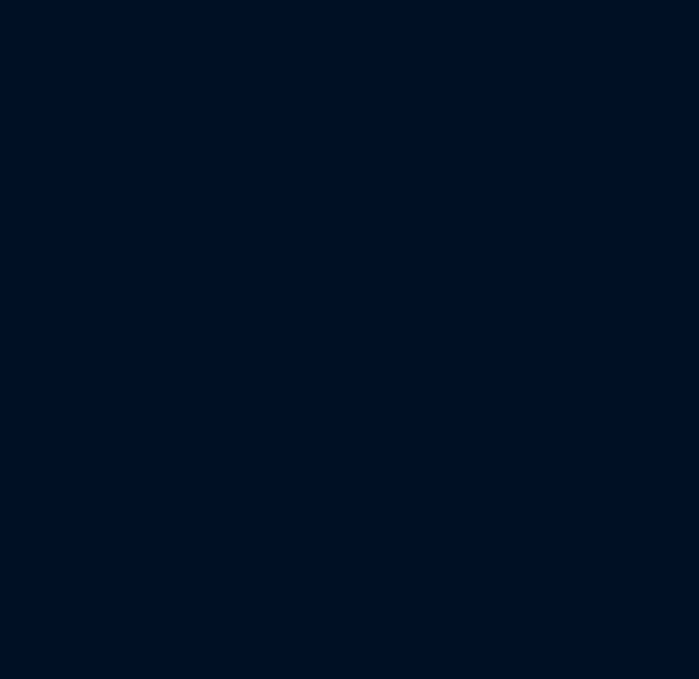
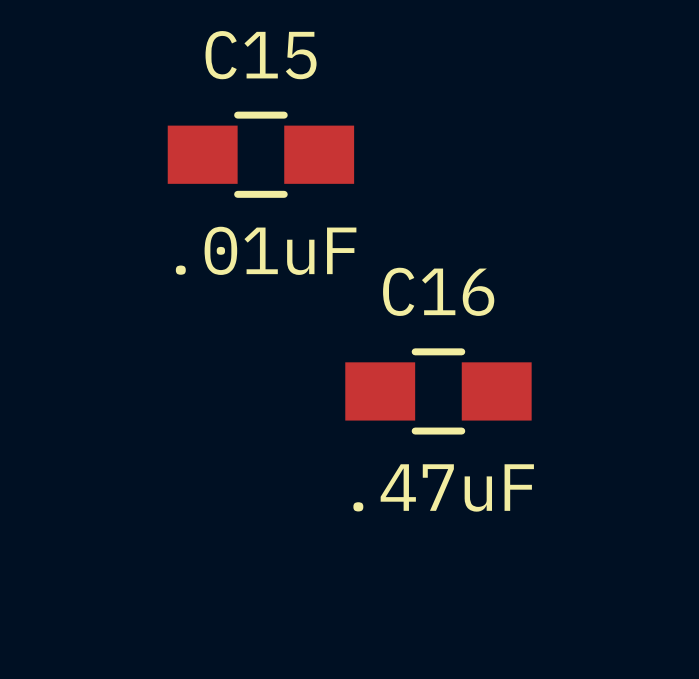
C15: none -> .01uF (260, 154)
C16: none -> .47uF (438, 391)

